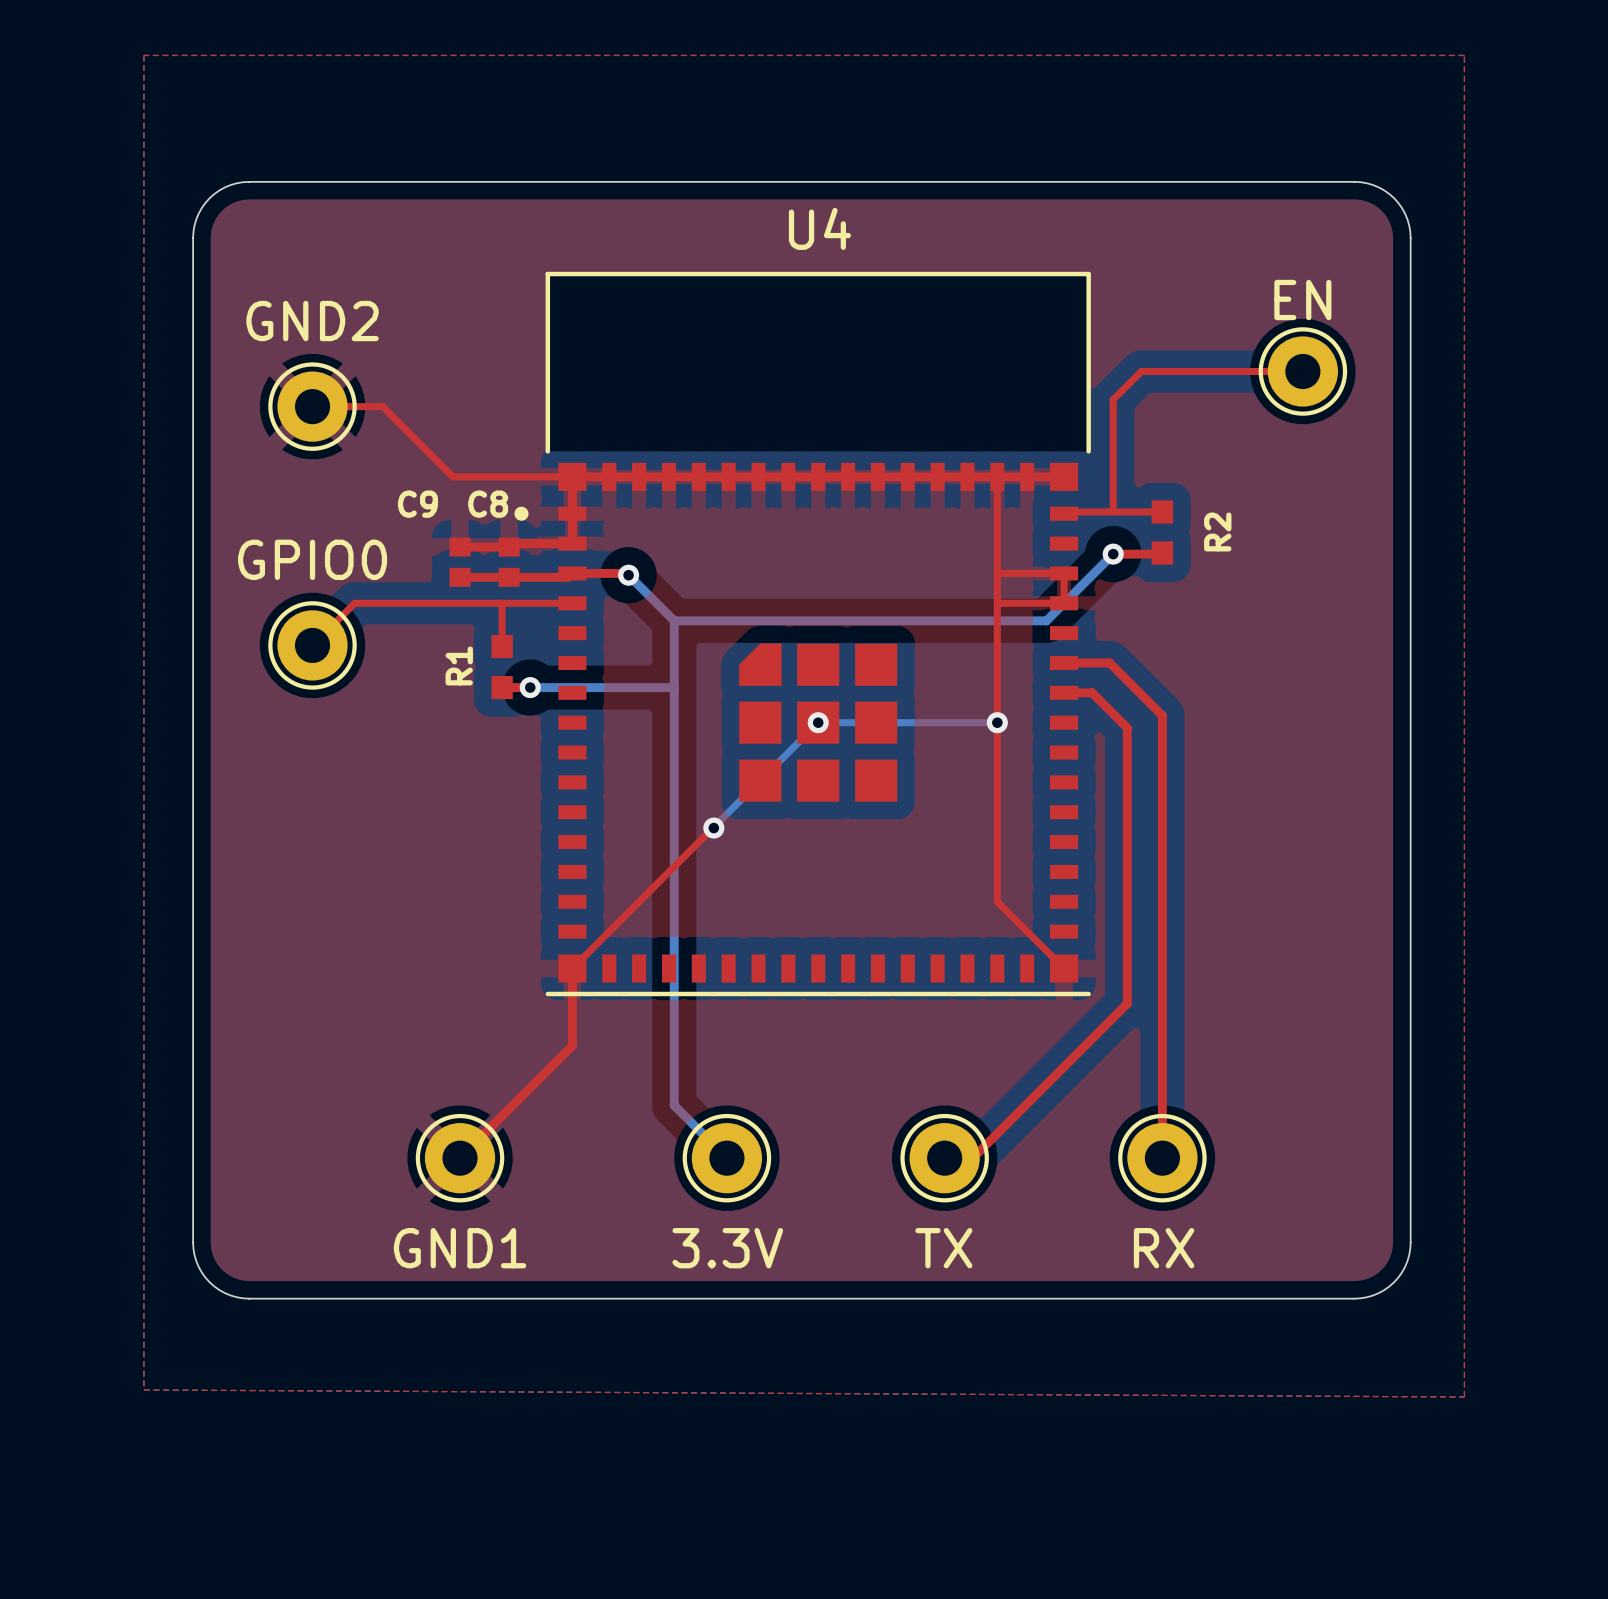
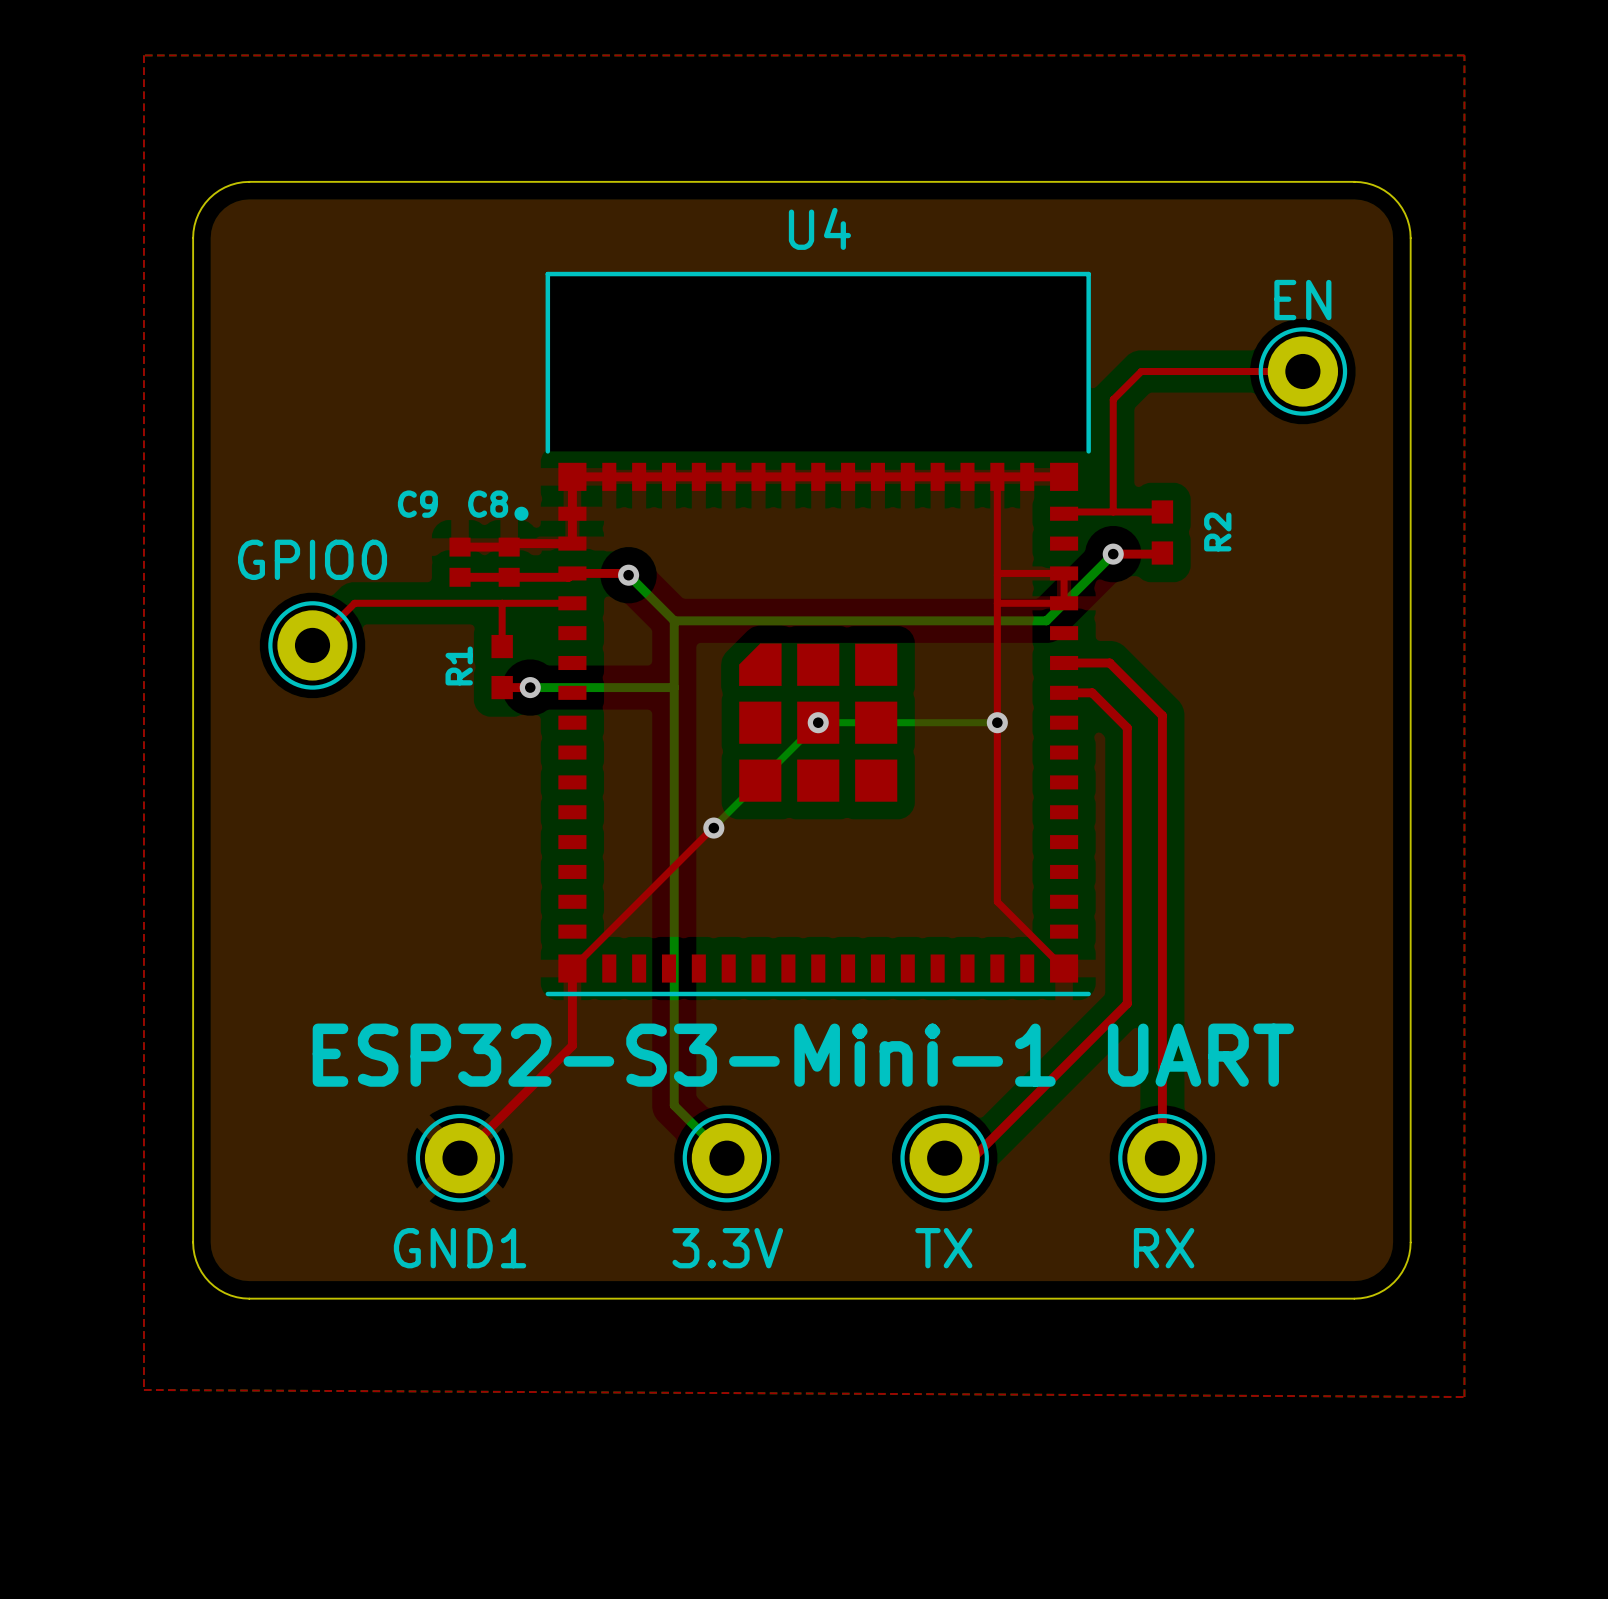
top track: (312, 406) (382, 406) (453, 476) (572, 476) -> none
GND2: (312, 406) -> none
text: none -> ESP32-S3-Mini-1 UART (803, 1055)

